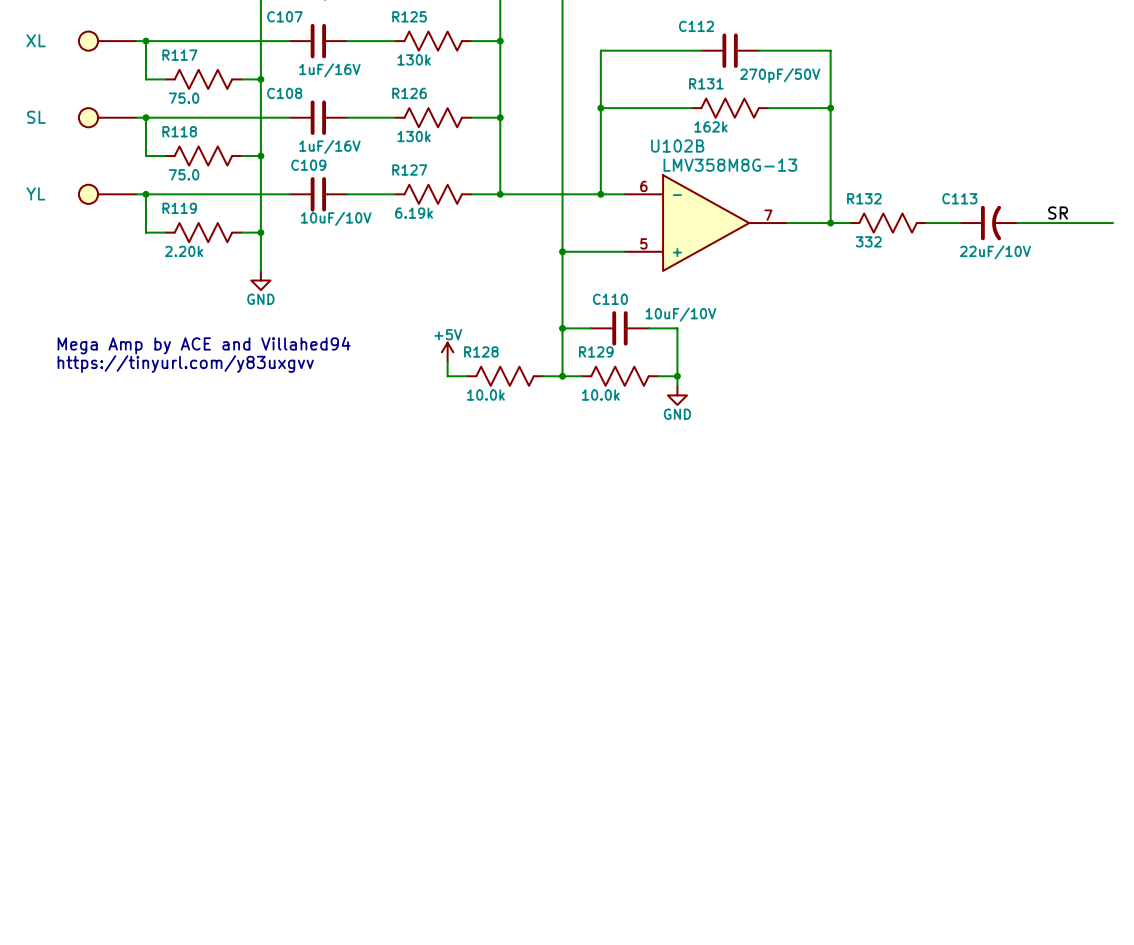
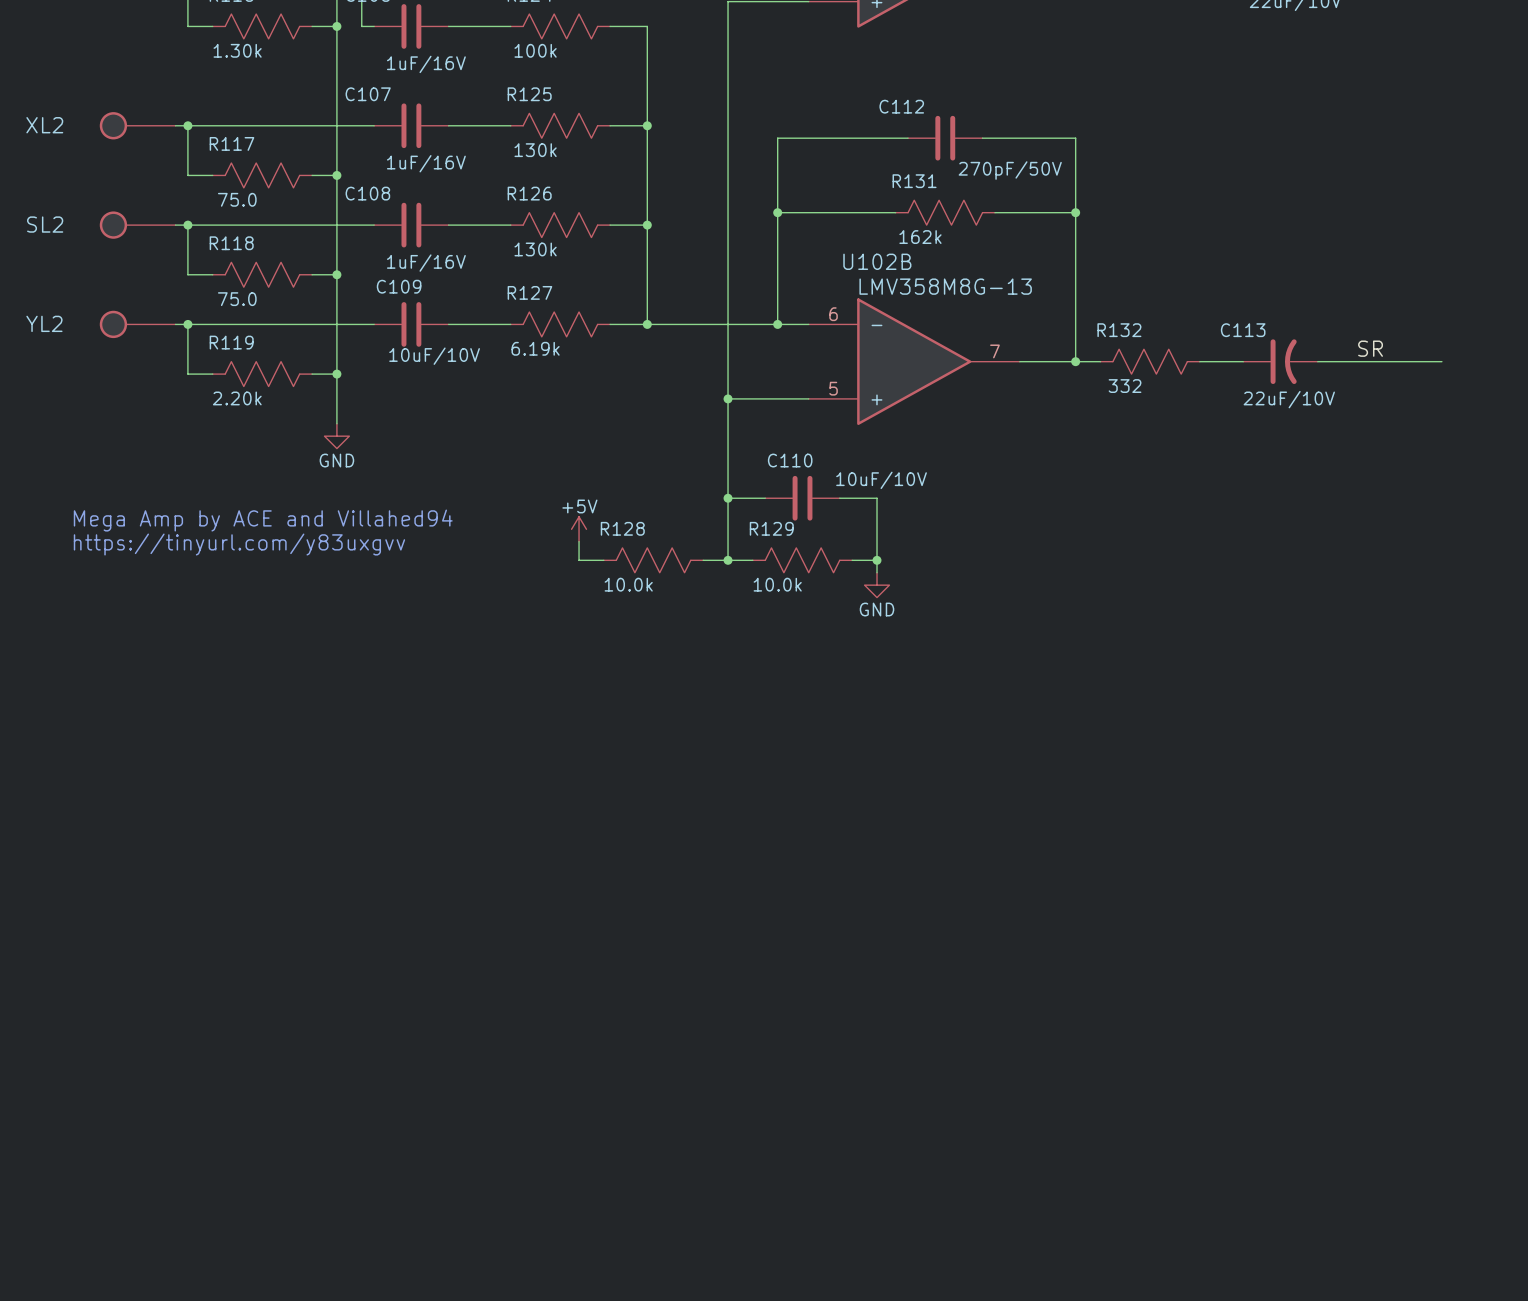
XL name: XL (36, 40) -> XL2 (44, 125)
SL name: SL (36, 117) -> SL2 (45, 224)
YL name: YL (35, 193) -> YL2 (44, 323)

